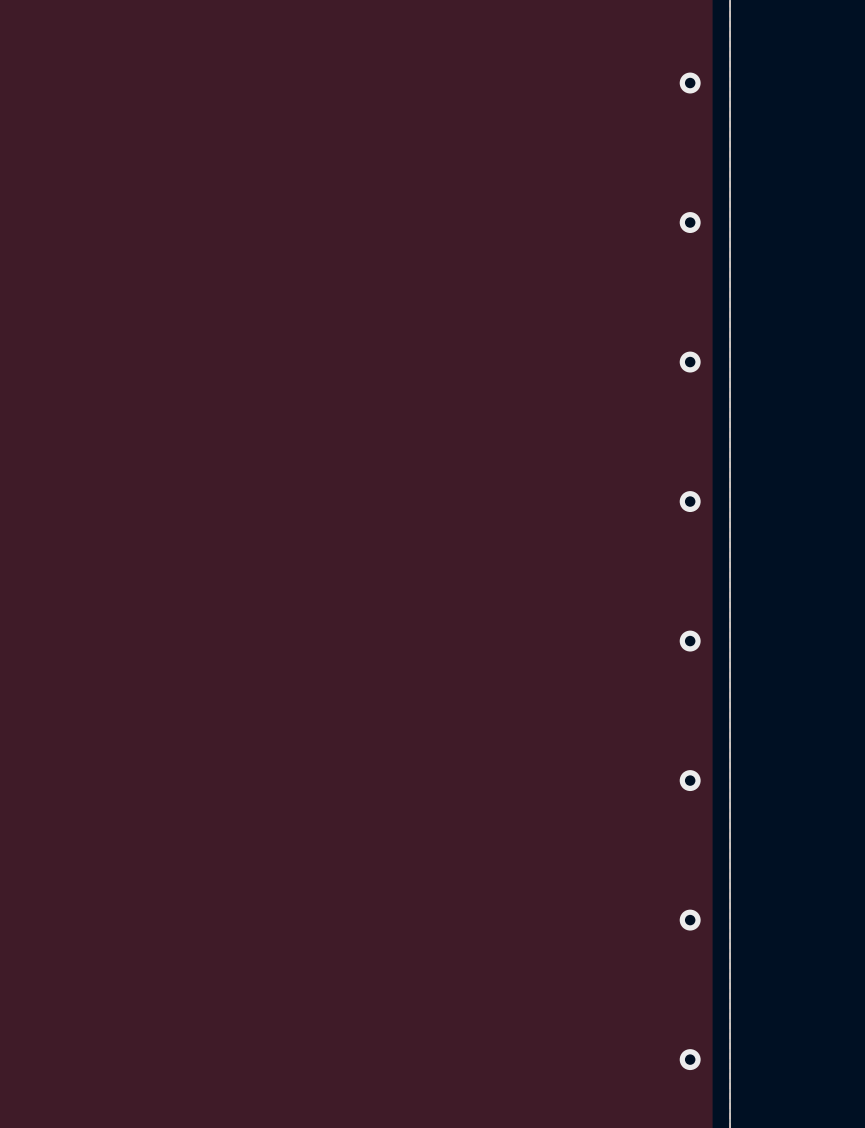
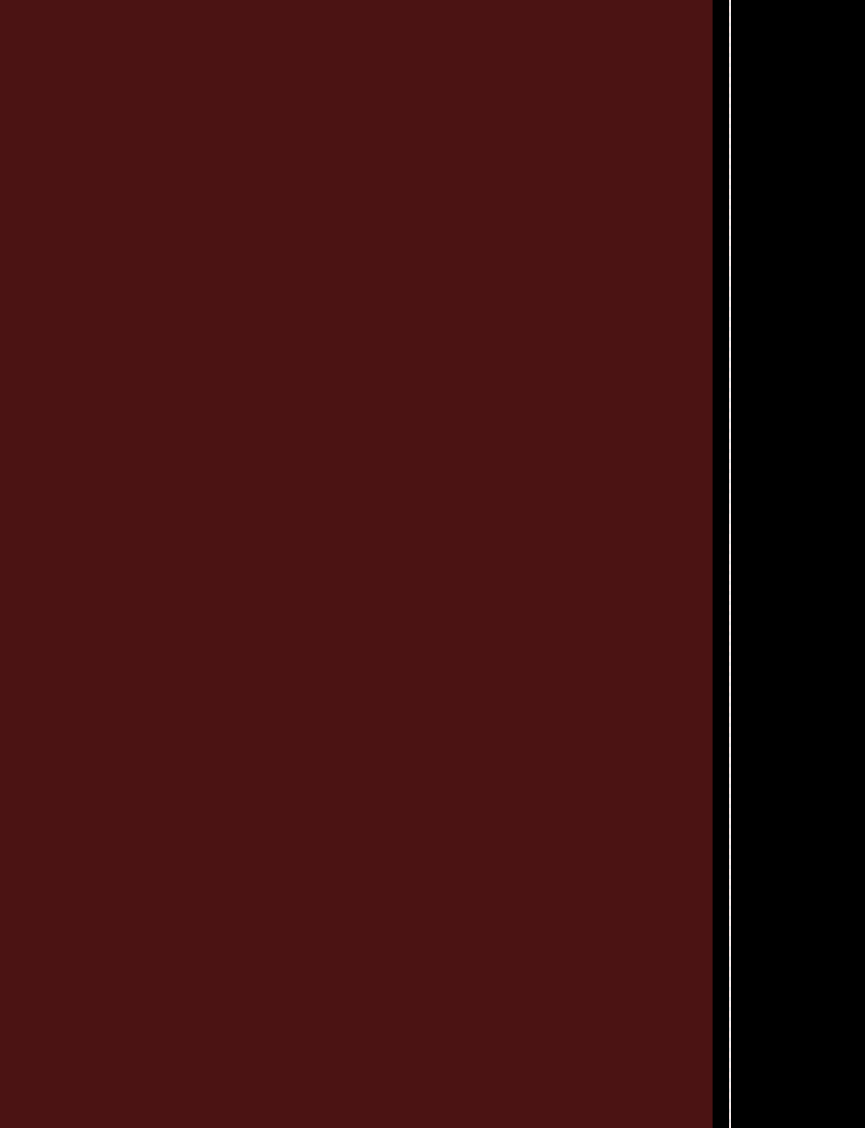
via: (690, 83) -> none
via: (690, 222) -> none
via: (690, 362) -> none
via: (690, 501) -> none
via: (690, 641) -> none
via: (690, 780) -> none
via: (690, 920) -> none
via: (690, 1059) -> none

